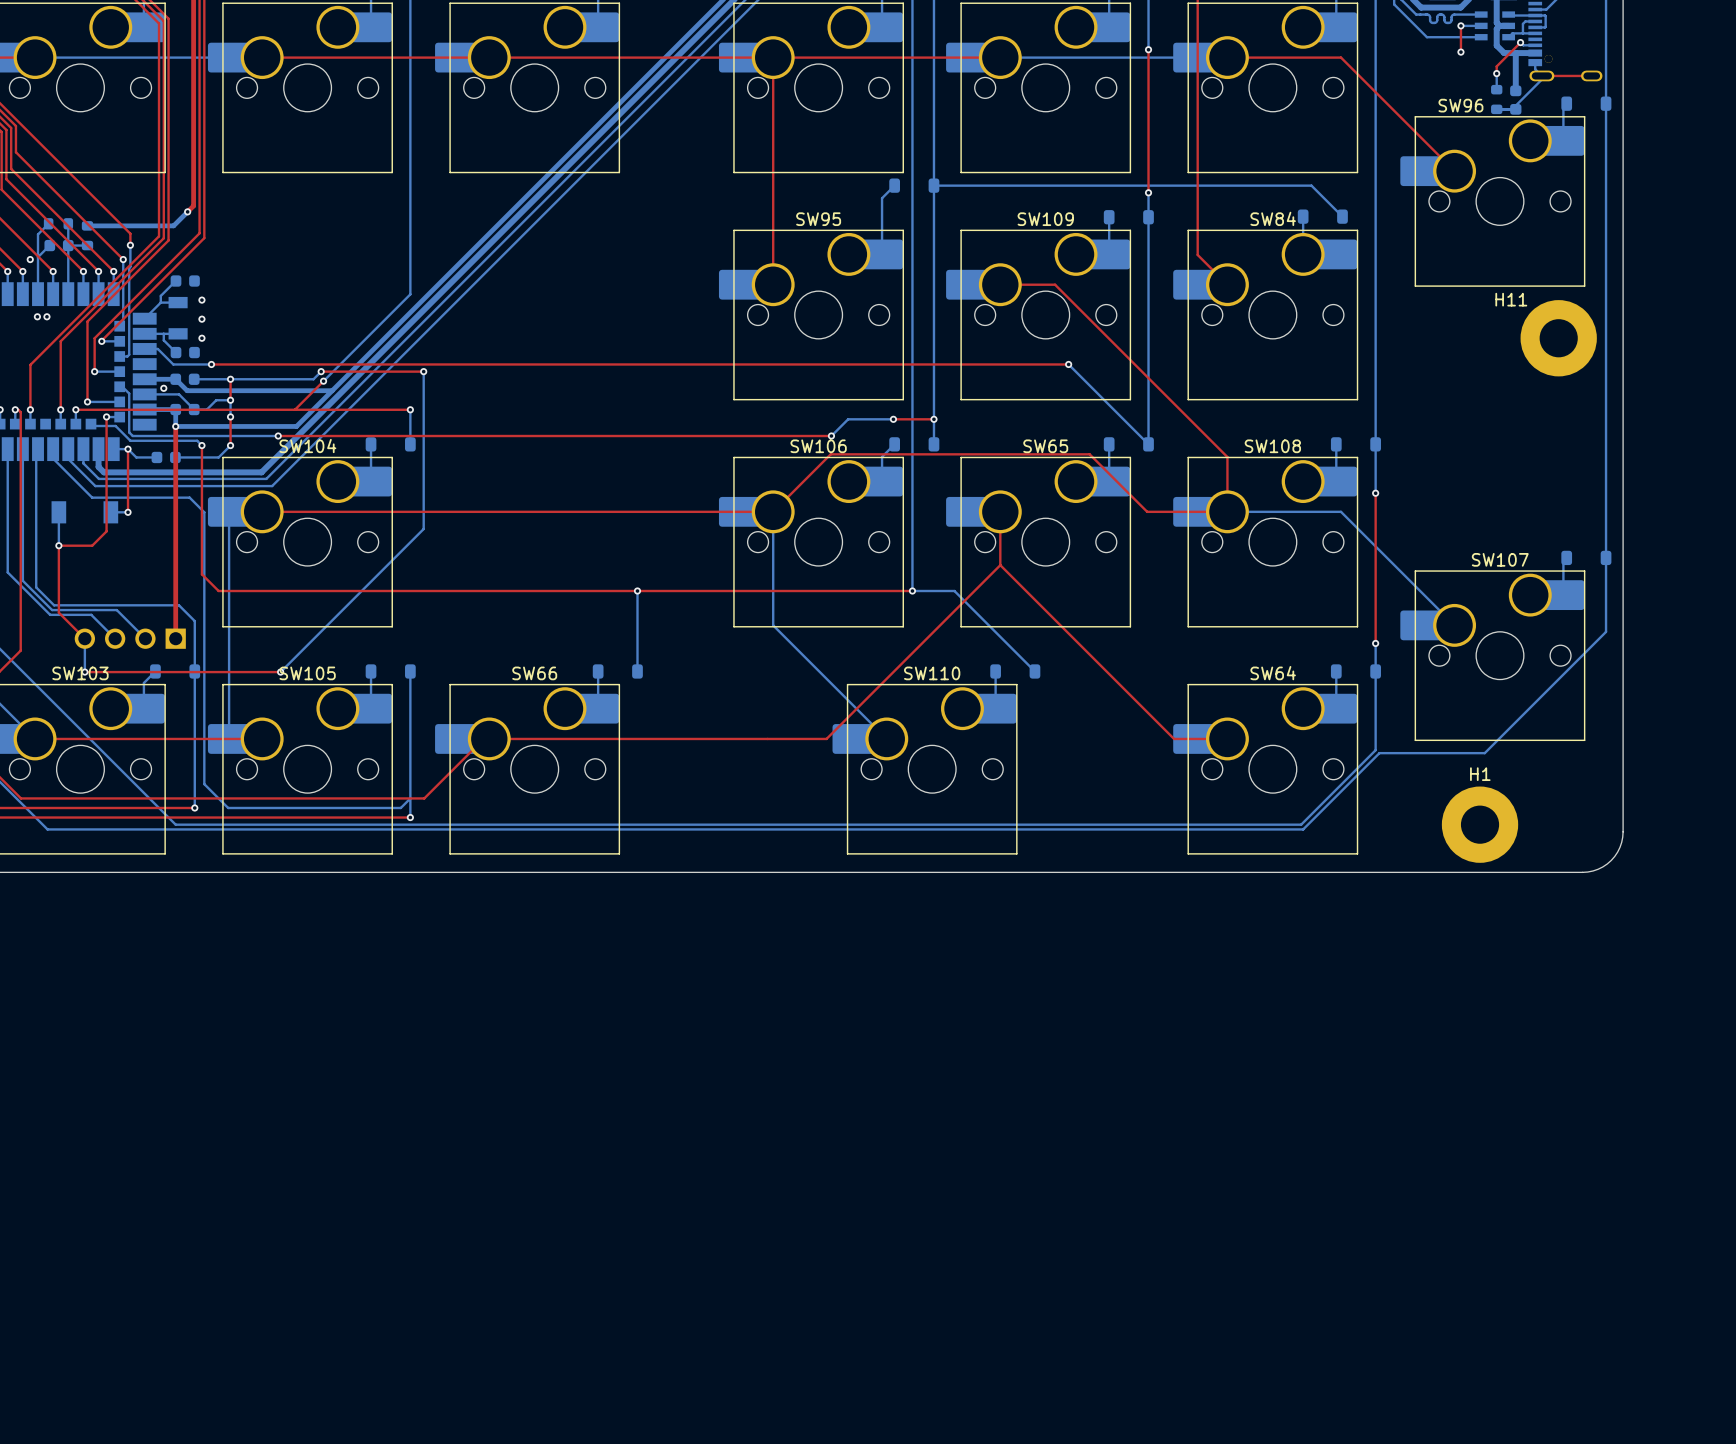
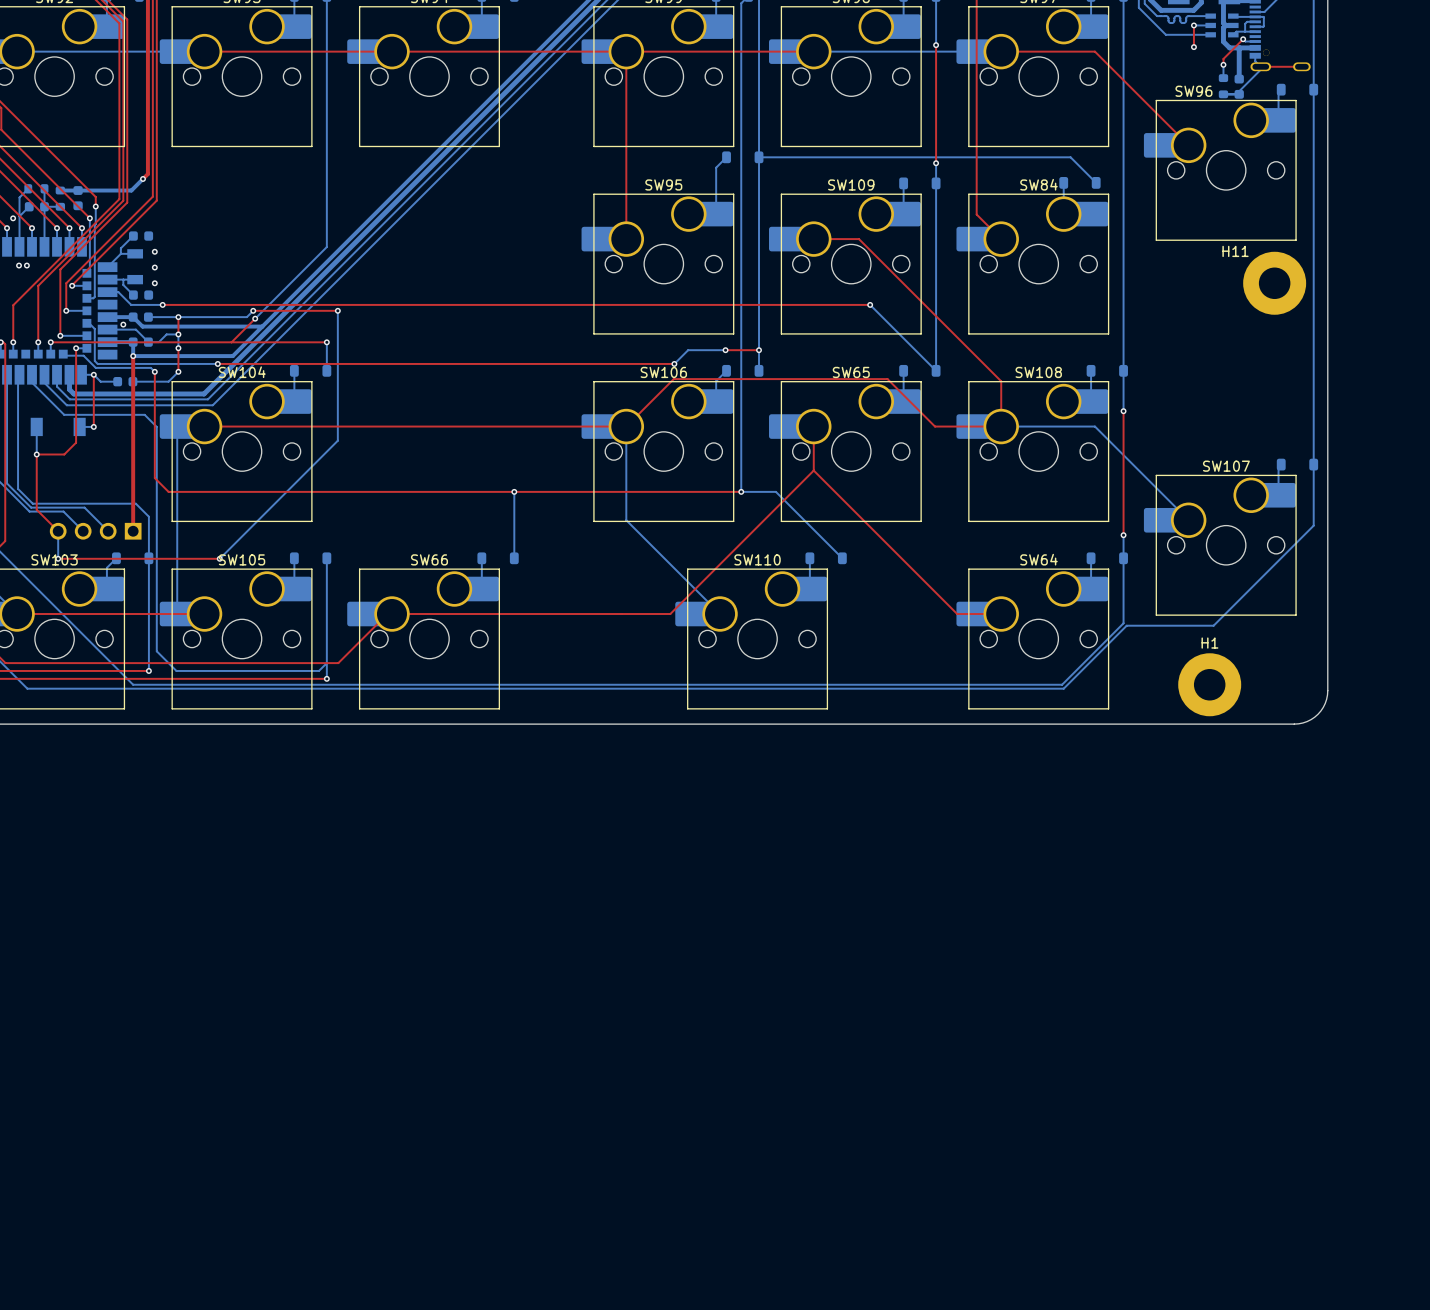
part: none -> (78, 198)

